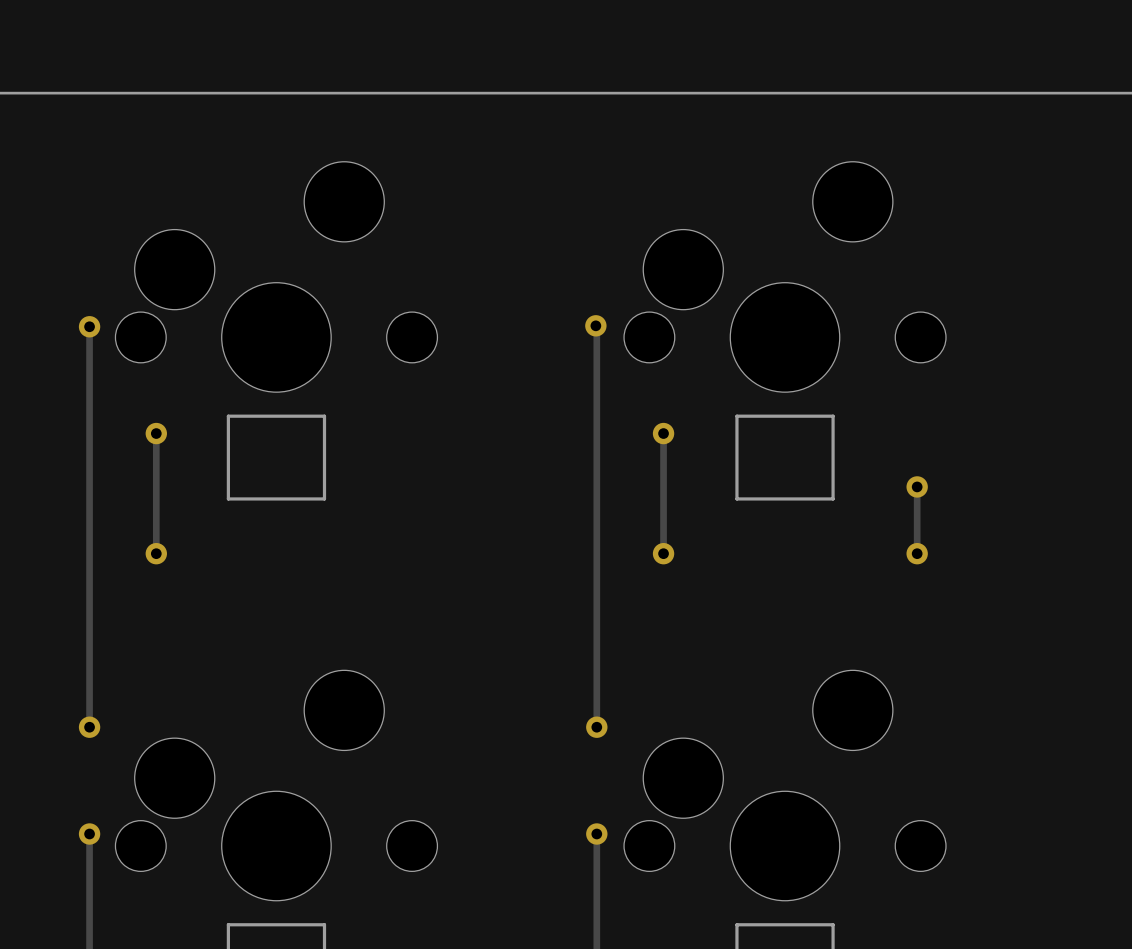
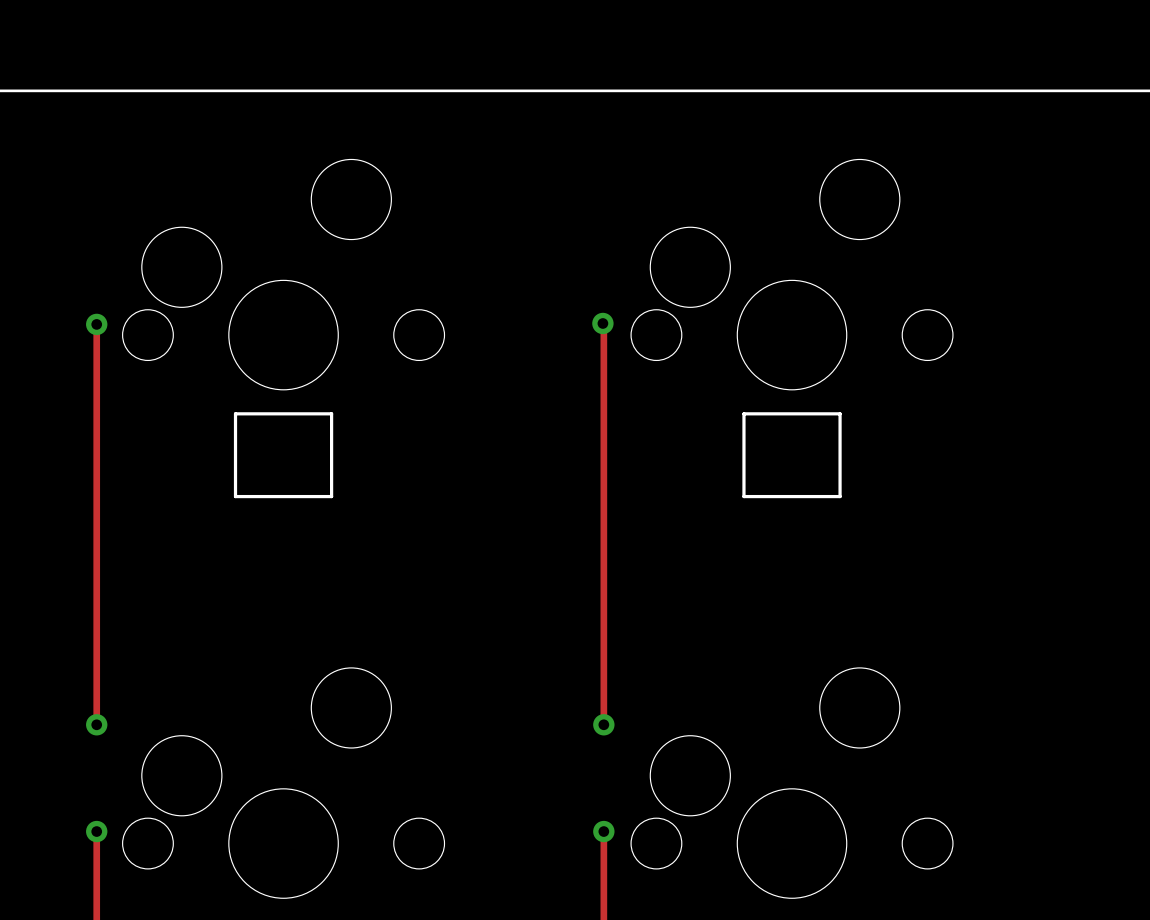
track: (156, 433) (156, 553) -> none
via: (156, 433) -> none
track: (663, 433) (663, 553) -> none
via: (663, 433) -> none
track: (917, 486) (917, 553) -> none
via: (917, 486) -> none
via: (156, 553) -> none
via: (663, 553) -> none
via: (917, 553) -> none

